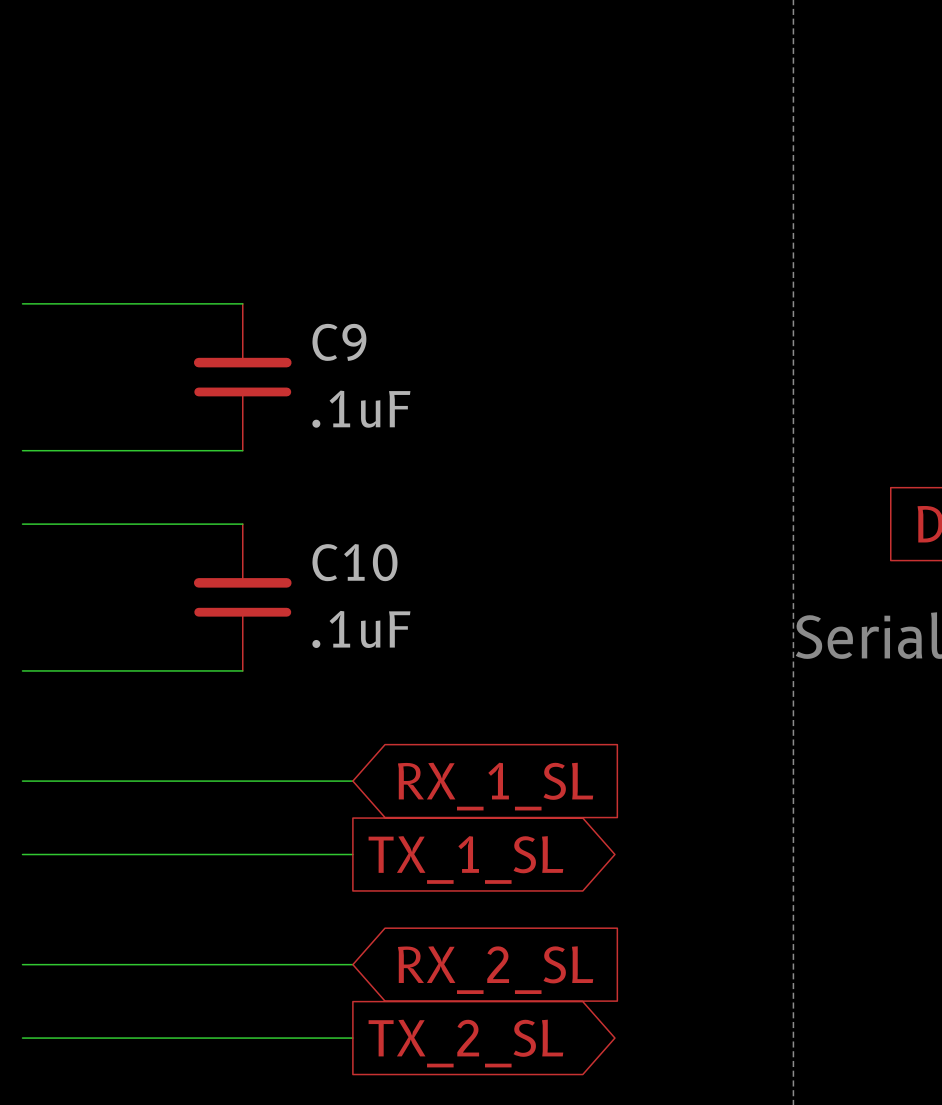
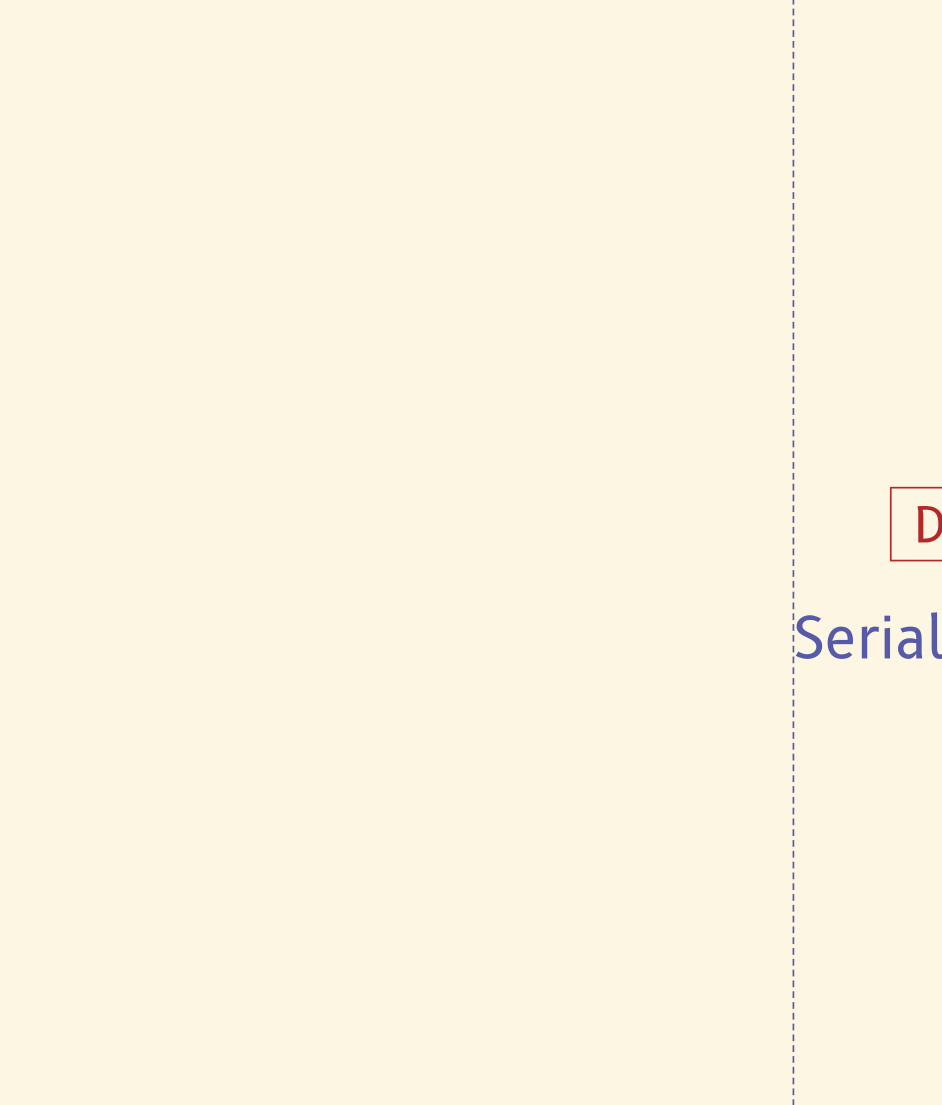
wire: (22, 303) (242, 303) -> none
C9: .1uF (242, 377) -> none
wire: (22, 450) (242, 450) -> none
wire: (22, 524) (242, 524) -> none
C10: .1uF (242, 597) -> none
wire: (22, 670) (242, 670) -> none
wire: (22, 781) (352, 781) -> none
global label: RX_1_SL (495, 786) -> none
wire: (22, 854) (352, 854) -> none
global label: TX_1_SL (465, 860) -> none
wire: (22, 964) (352, 964) -> none
global label: RX_2_SL (495, 970) -> none
wire: (22, 1038) (352, 1038) -> none
global label: TX_2_SL (465, 1043) -> none

